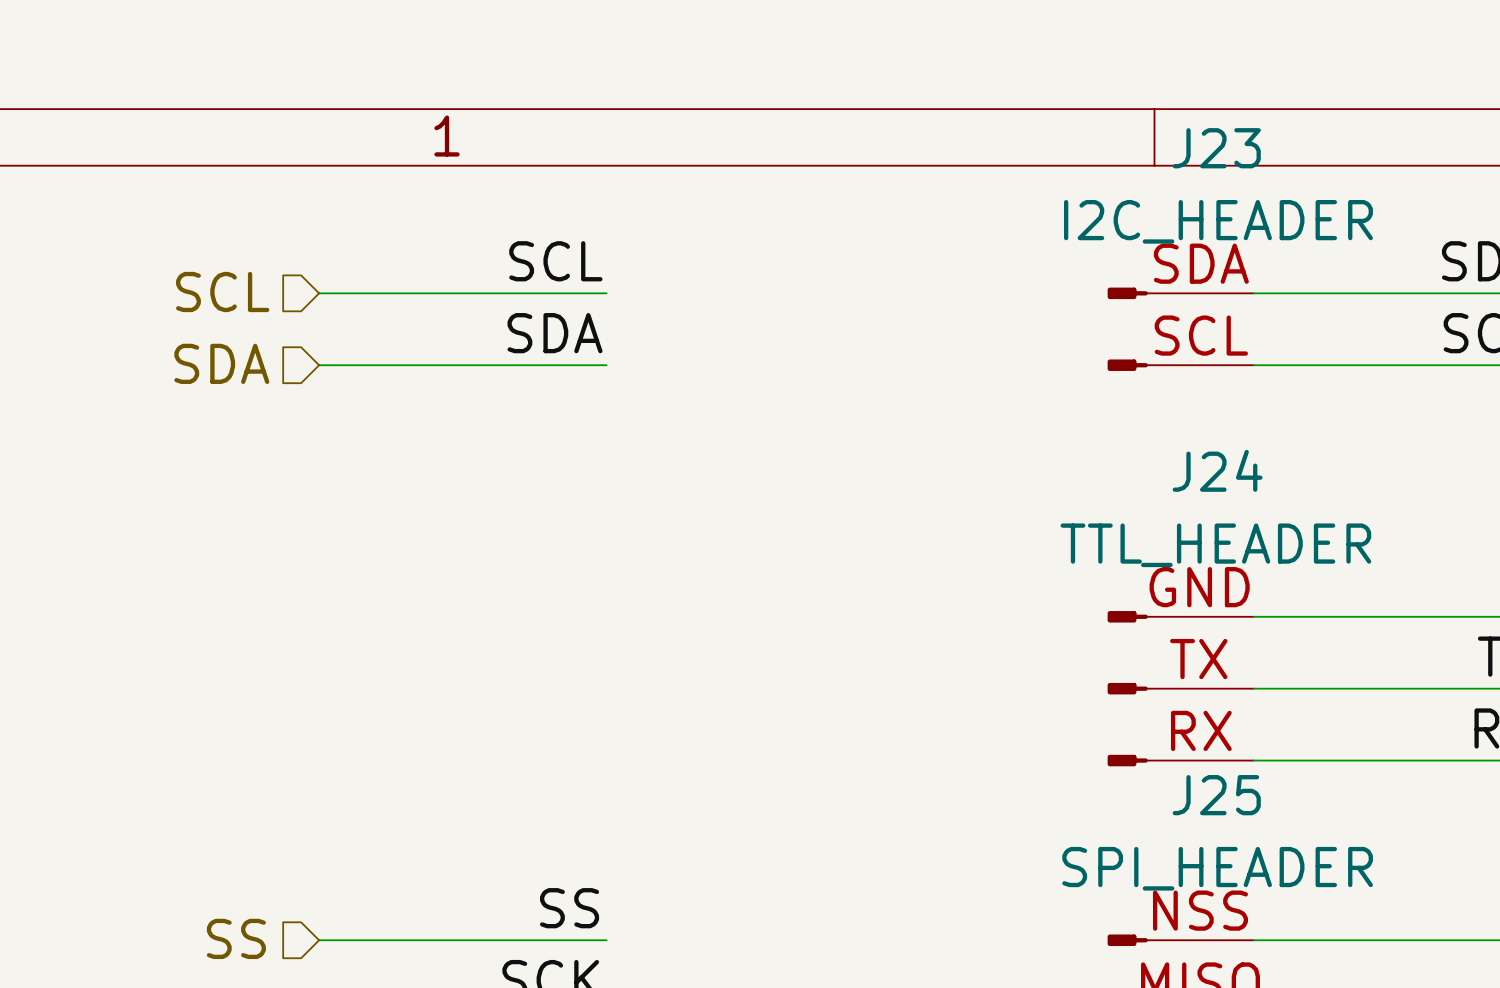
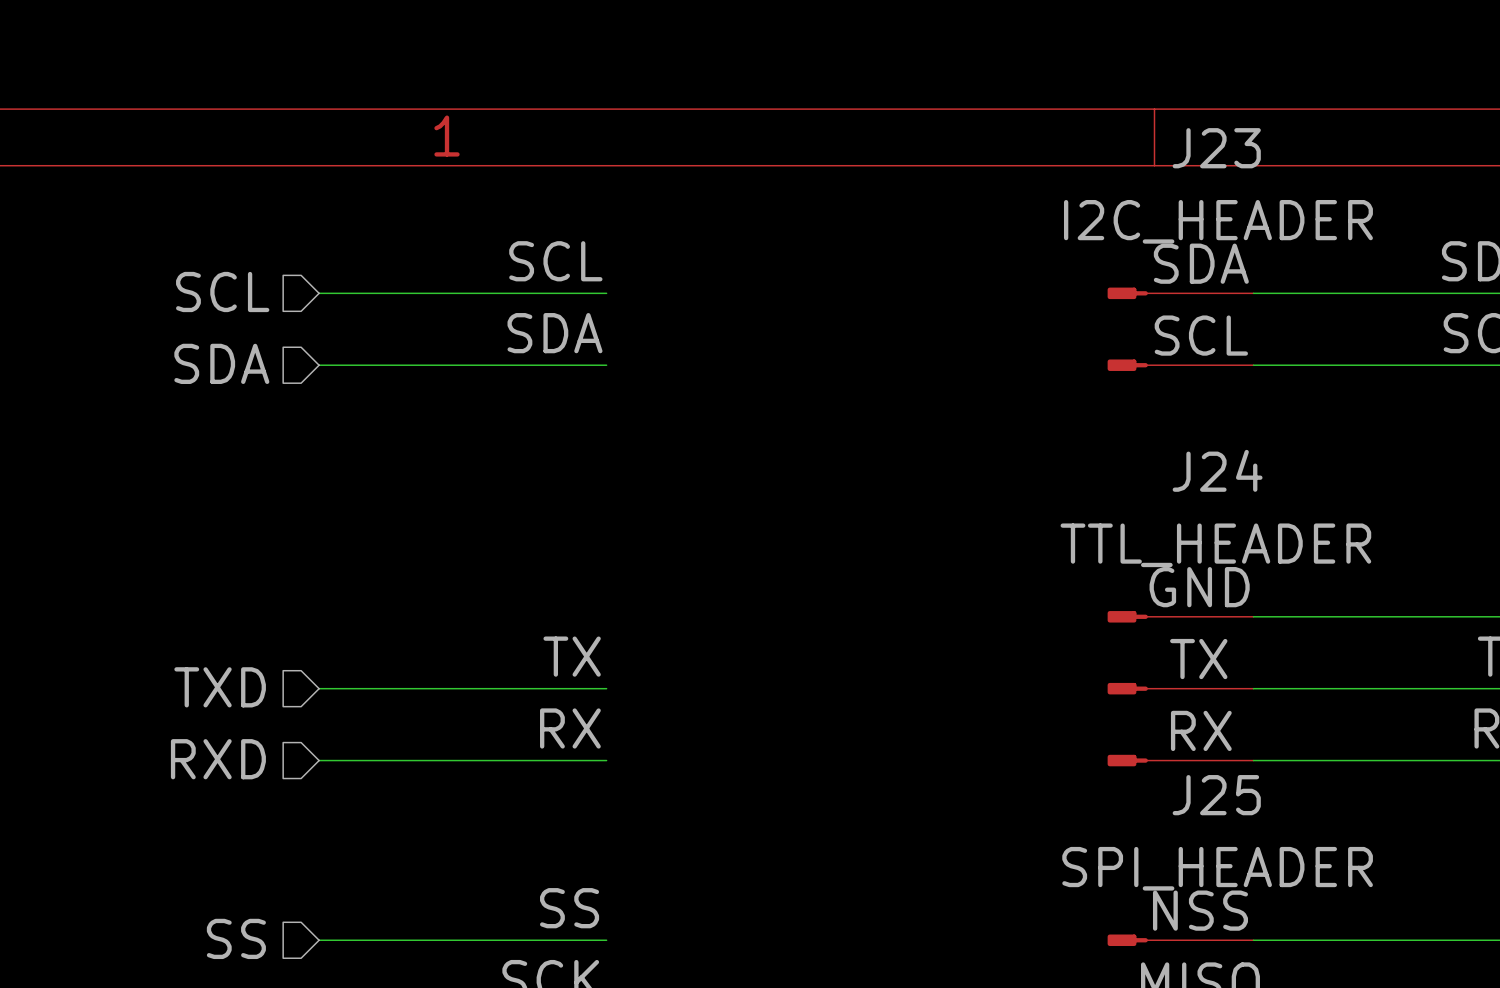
label: none -> TX (572, 656)
hierarchical label: none -> TXD (220, 687)
wire: none -> (319, 688) (606, 688)
label: none -> RX (570, 728)
hierarchical label: none -> RXD (218, 759)
wire: none -> (319, 760) (606, 760)

